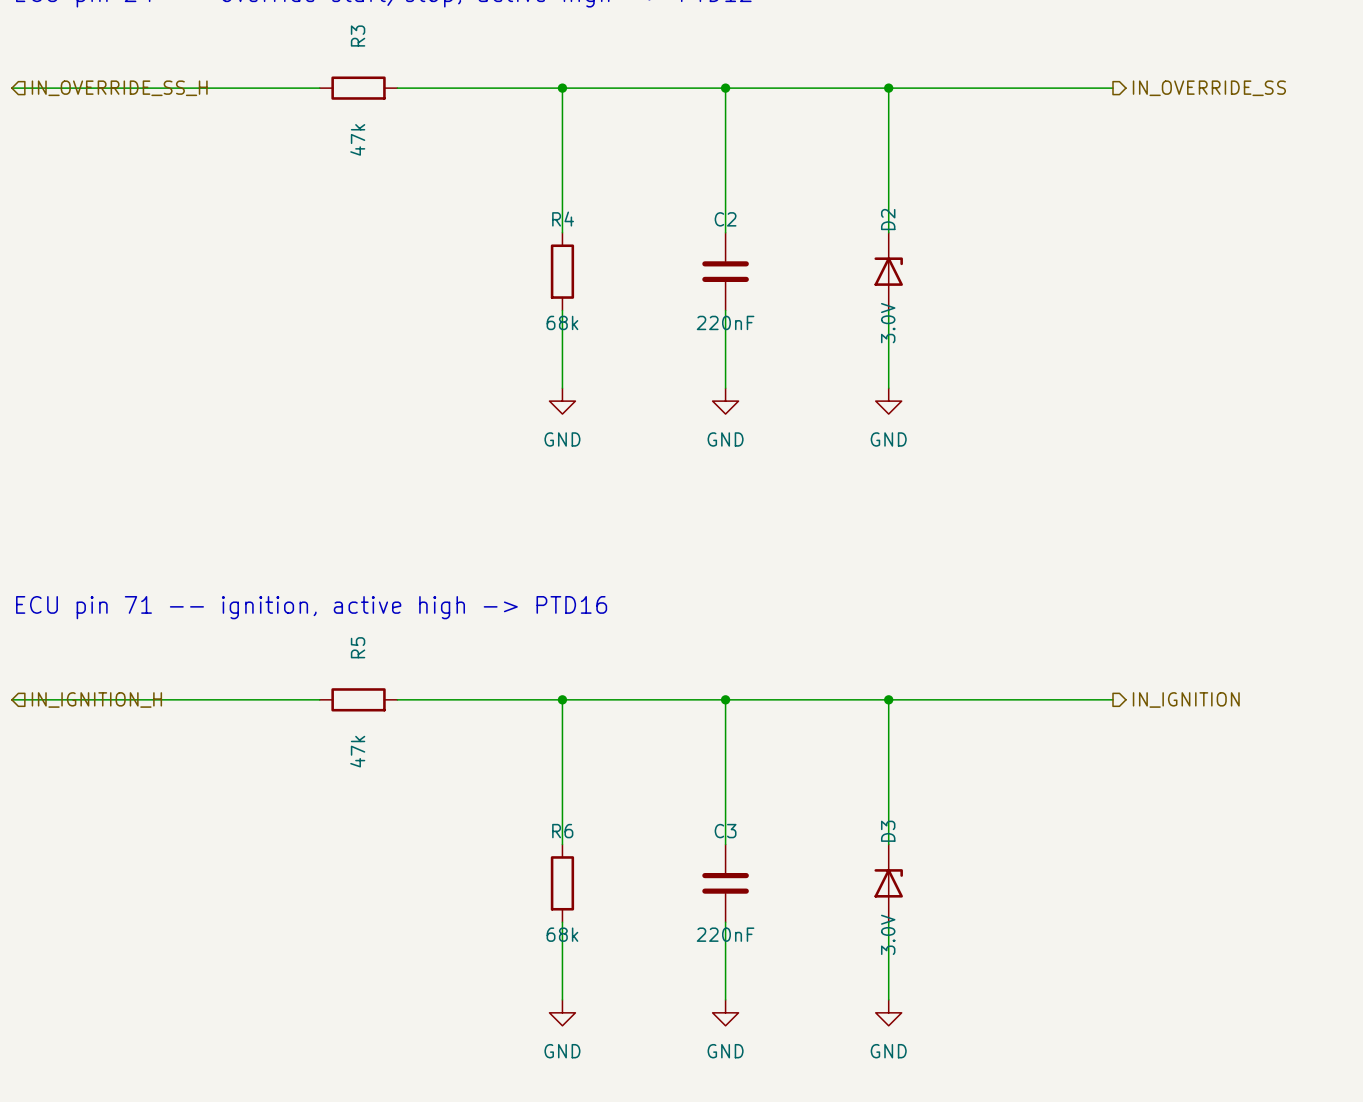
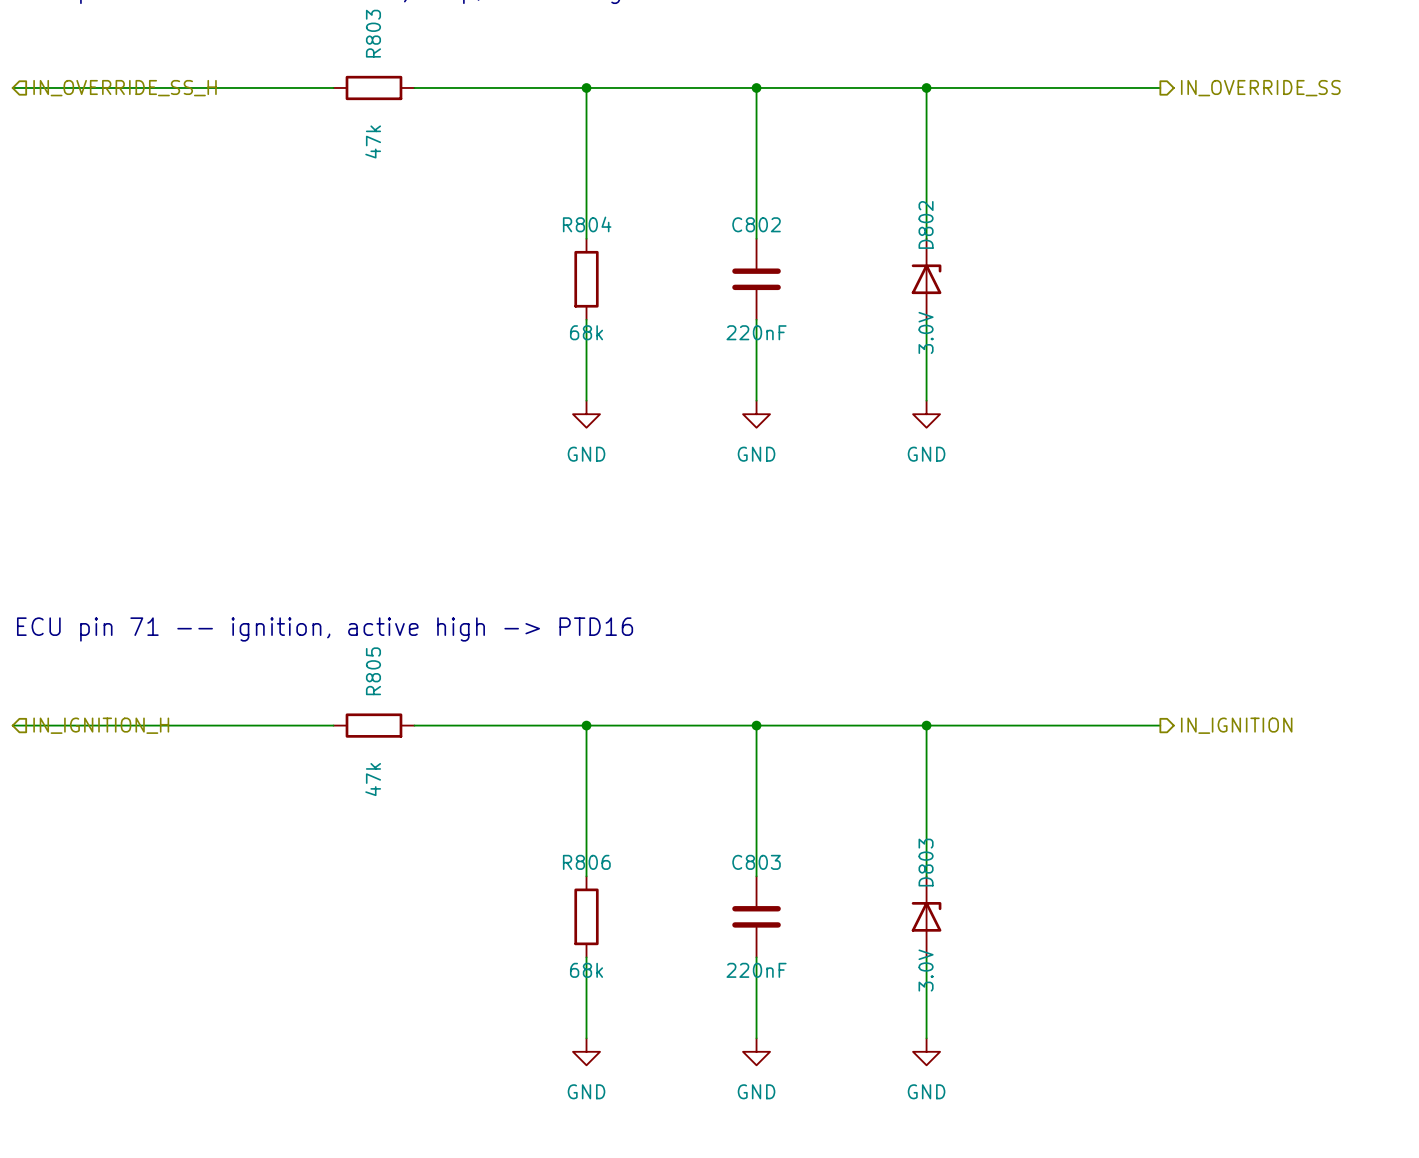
R3 name: R3 (358, 36) -> R803 (373, 33)
R4 name: R4 (563, 219) -> R804 (587, 224)
C2 name: C2 (725, 219) -> C802 (756, 224)
D2 name: D2 (888, 219) -> D802 (926, 224)
R5 name: R5 (358, 647) -> R805 (373, 671)
R6 name: R6 (562, 831) -> R806 (586, 862)
C3 name: C3 (725, 831) -> C803 (756, 862)
D3 name: D3 (888, 831) -> D803 (926, 862)

